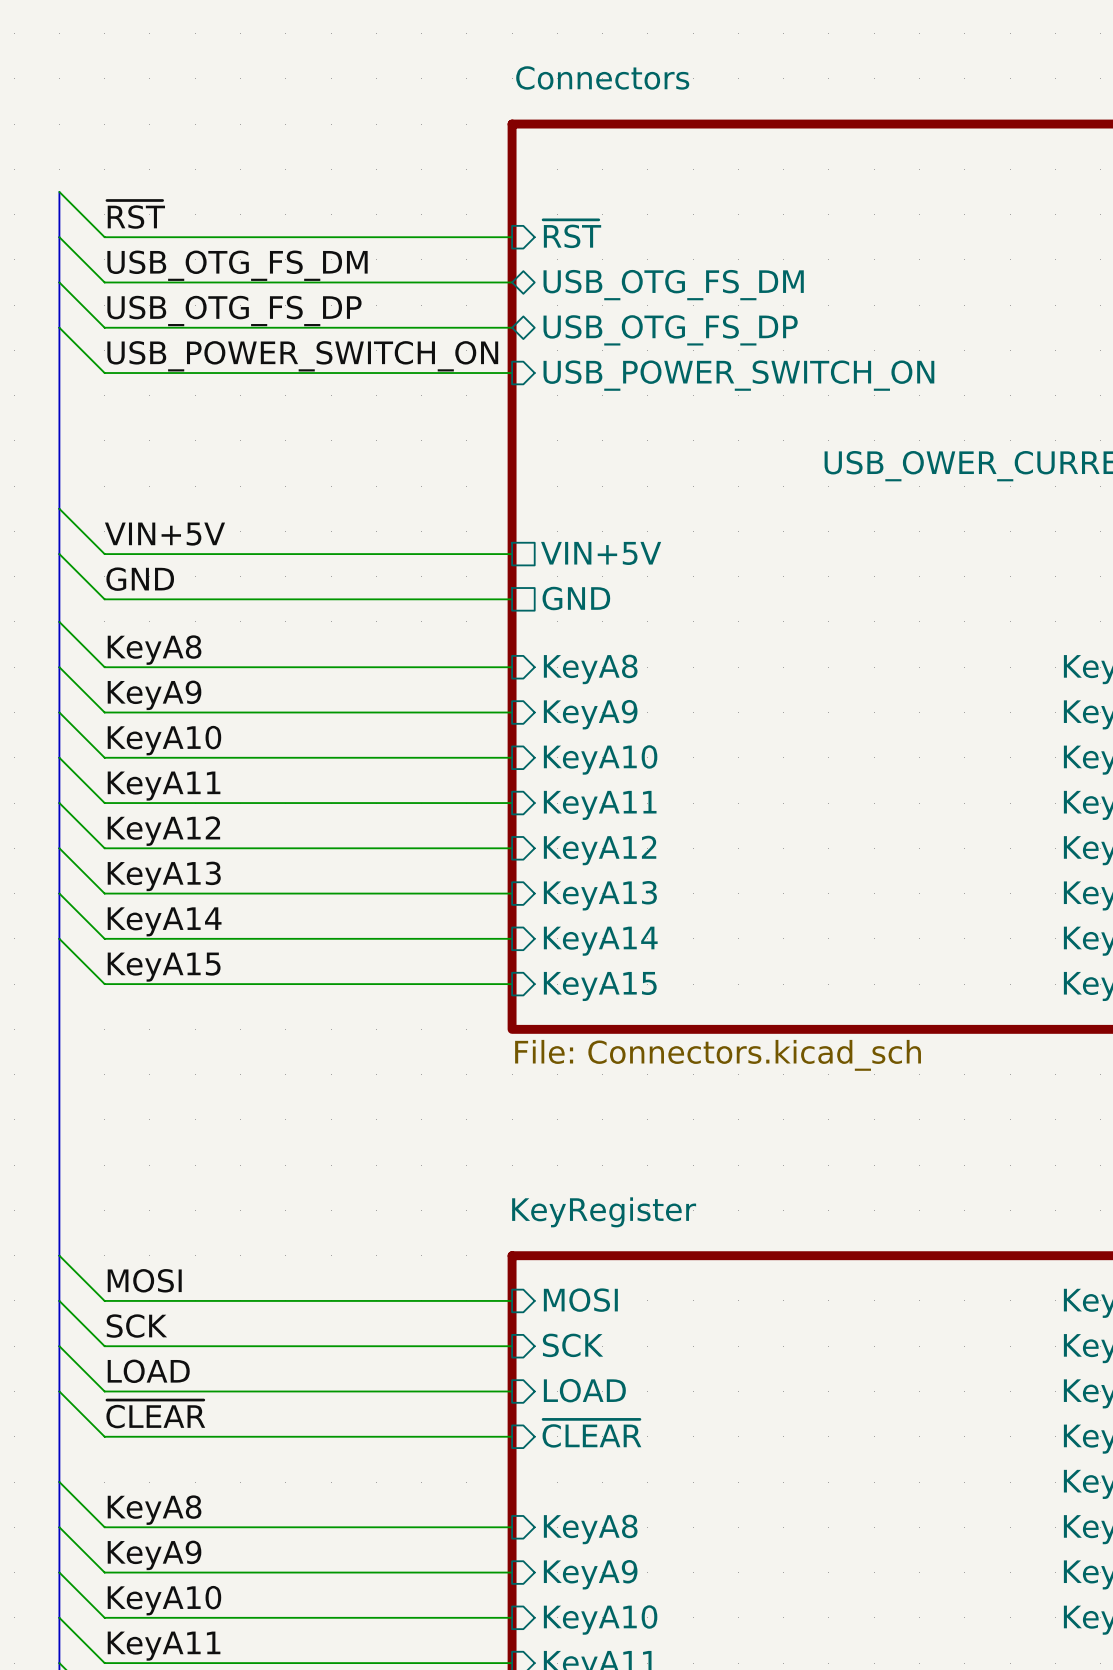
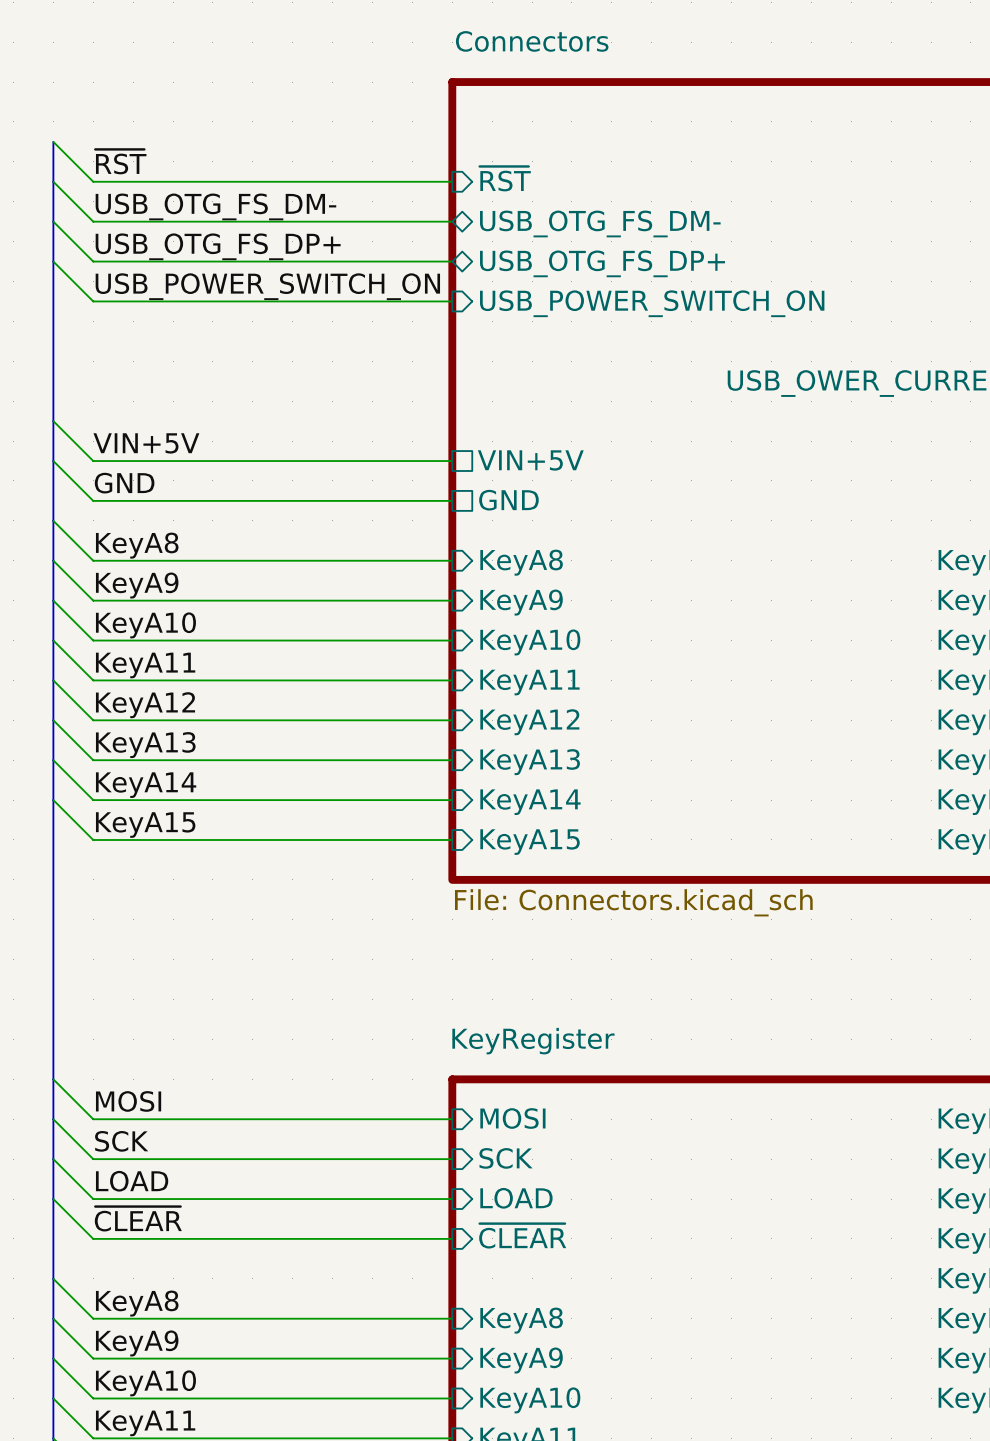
label: USB_OTG_FS_DM (237, 265) -> USB_OTG_FS_DM- (215, 206)
sheet pin: USB_OTG_FS_DM (673, 285) -> USB_OTG_FS_DM- (600, 223)
label: USB_OTG_FS_DP (234, 311) -> USB_OTG_FS_DP+ (218, 246)
sheet pin: USB_OTG_FS_DP (670, 330) -> USB_OTG_FS_DP+ (602, 263)

